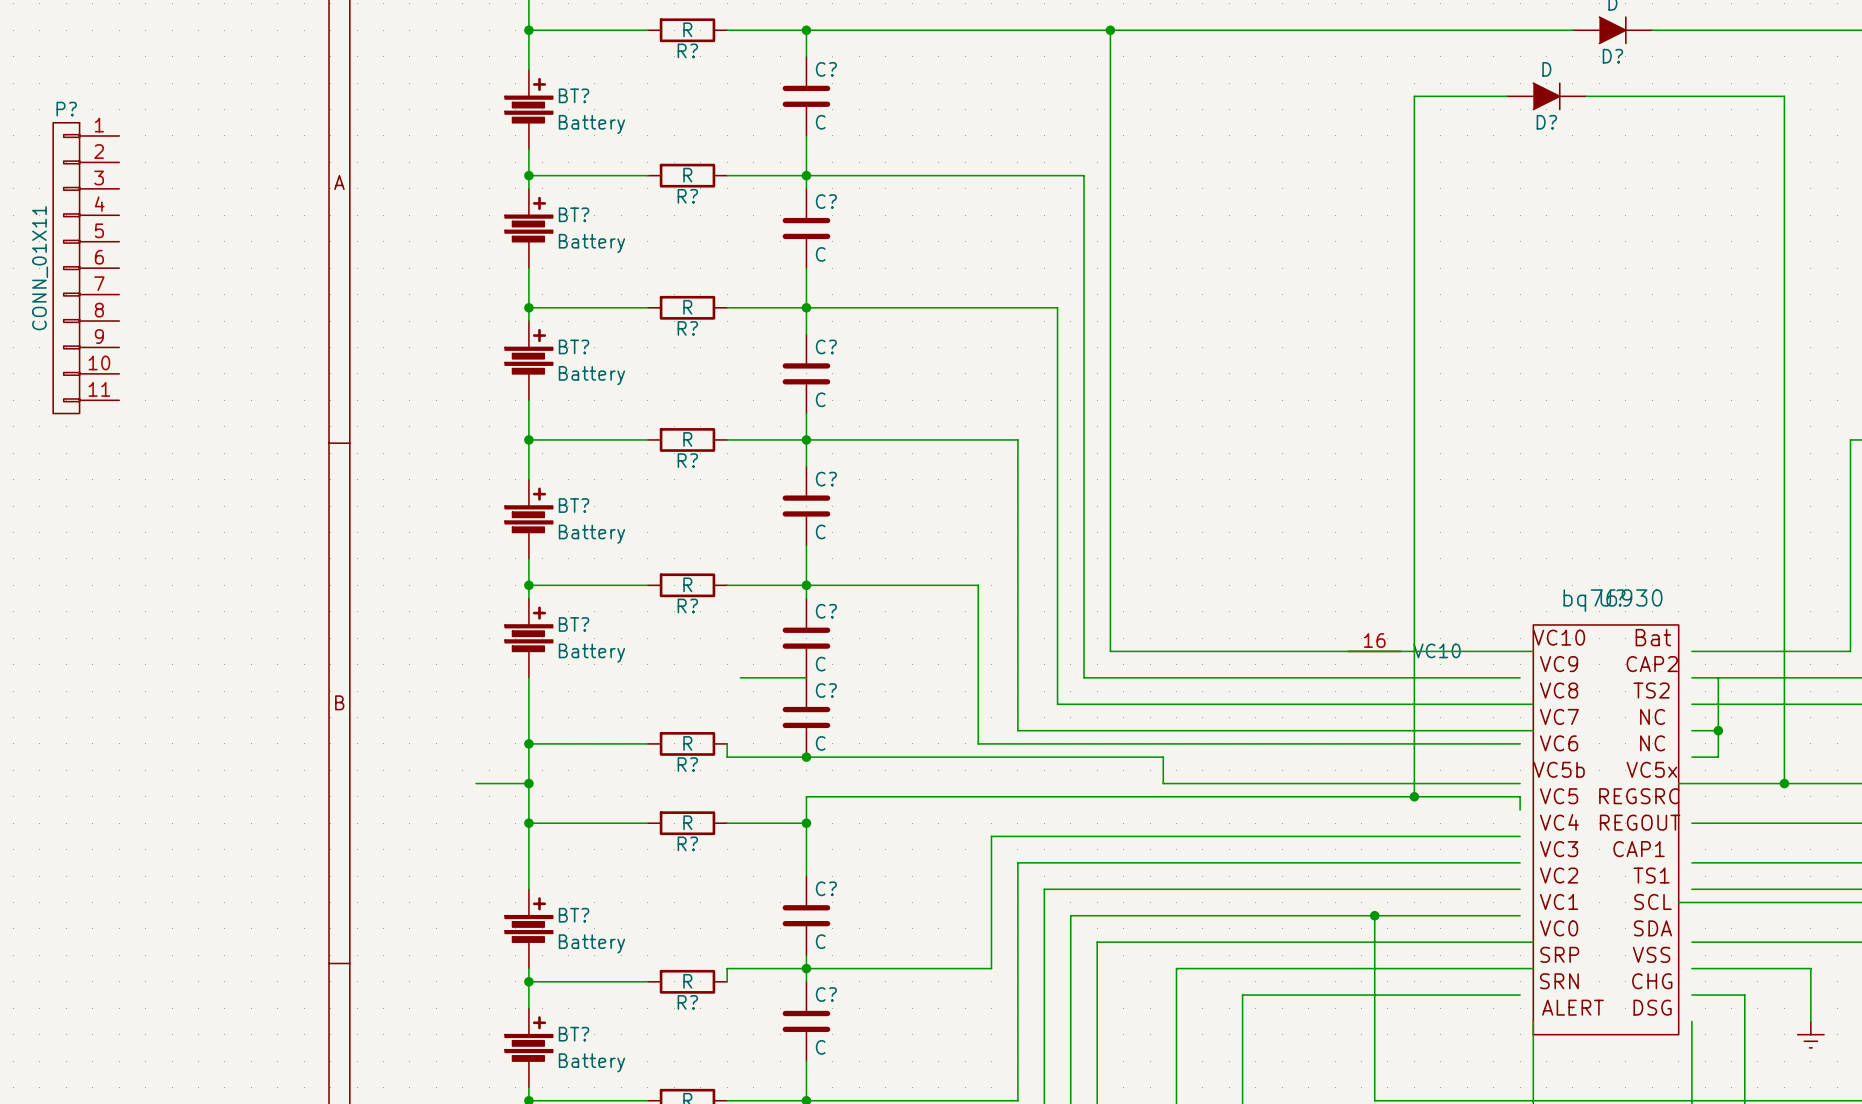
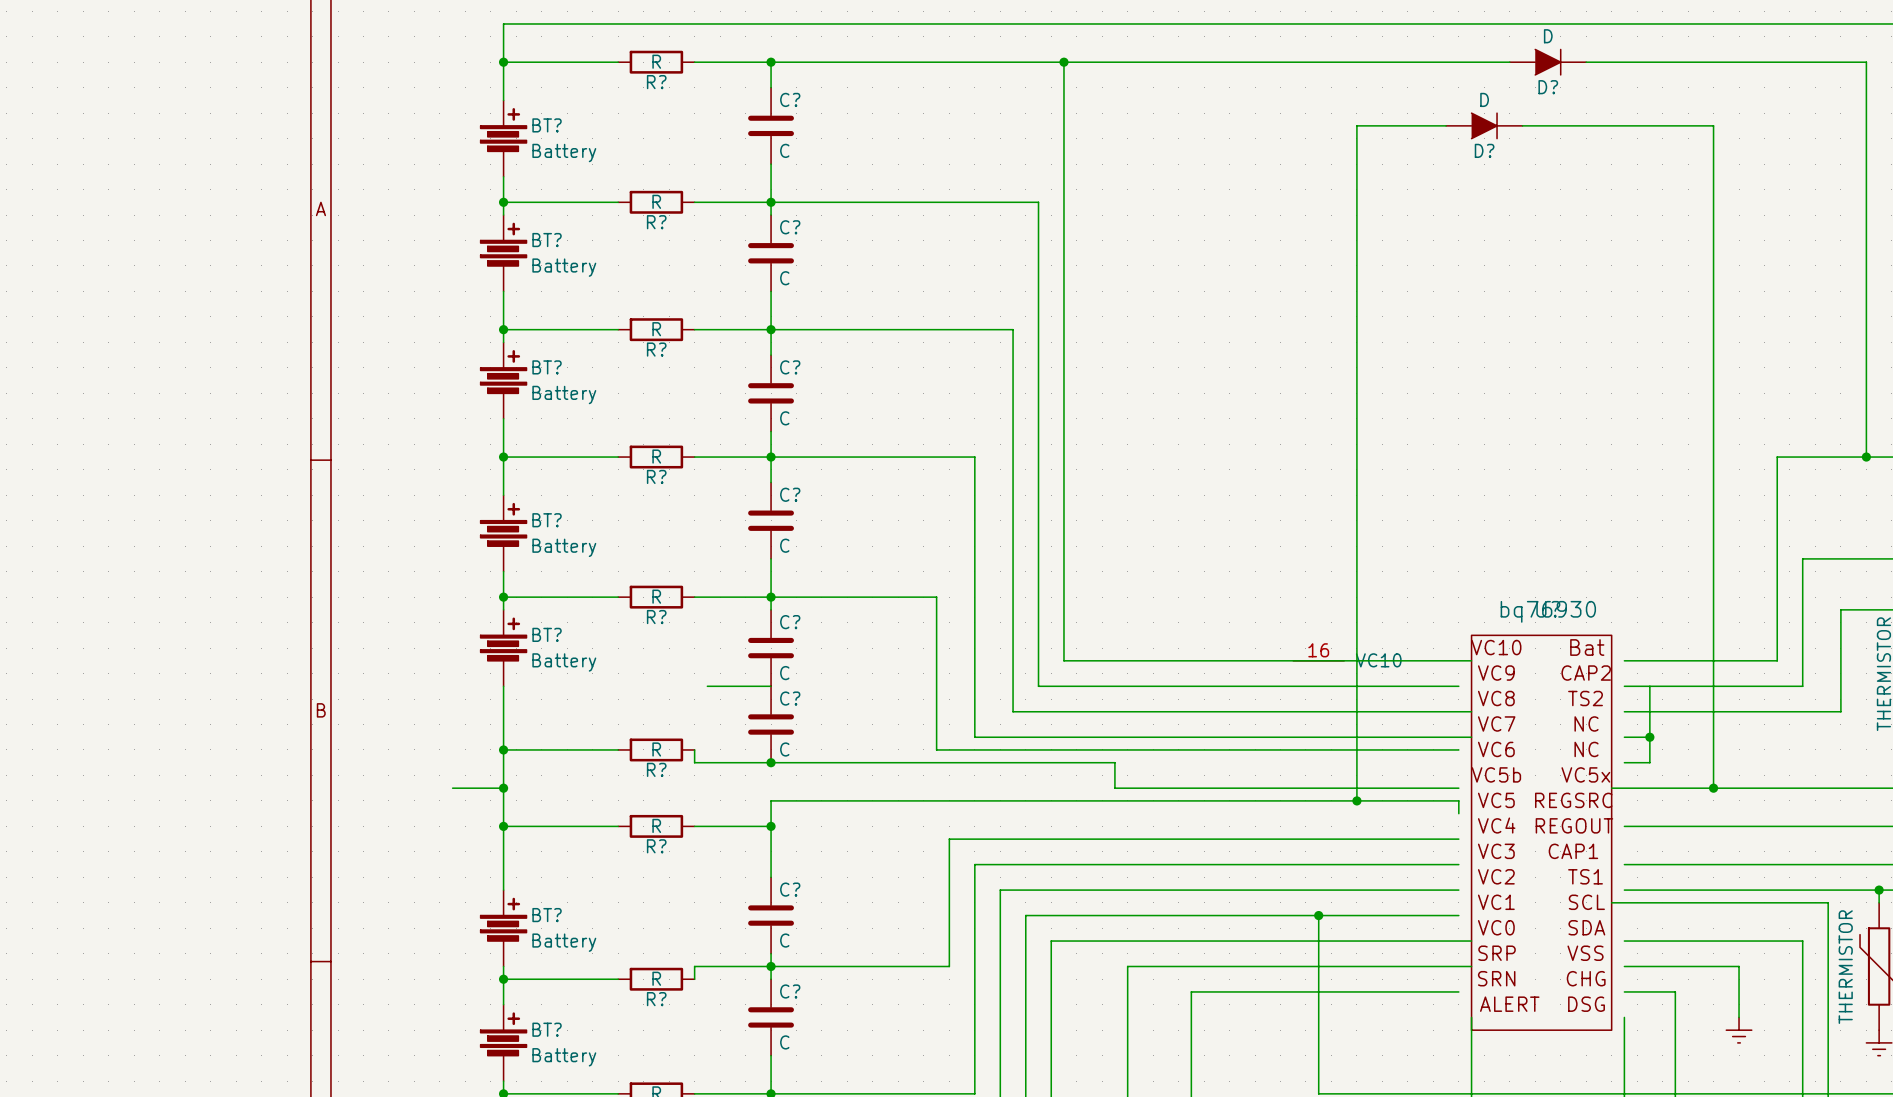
P?: CONN_01X11 (86, 268) -> none

